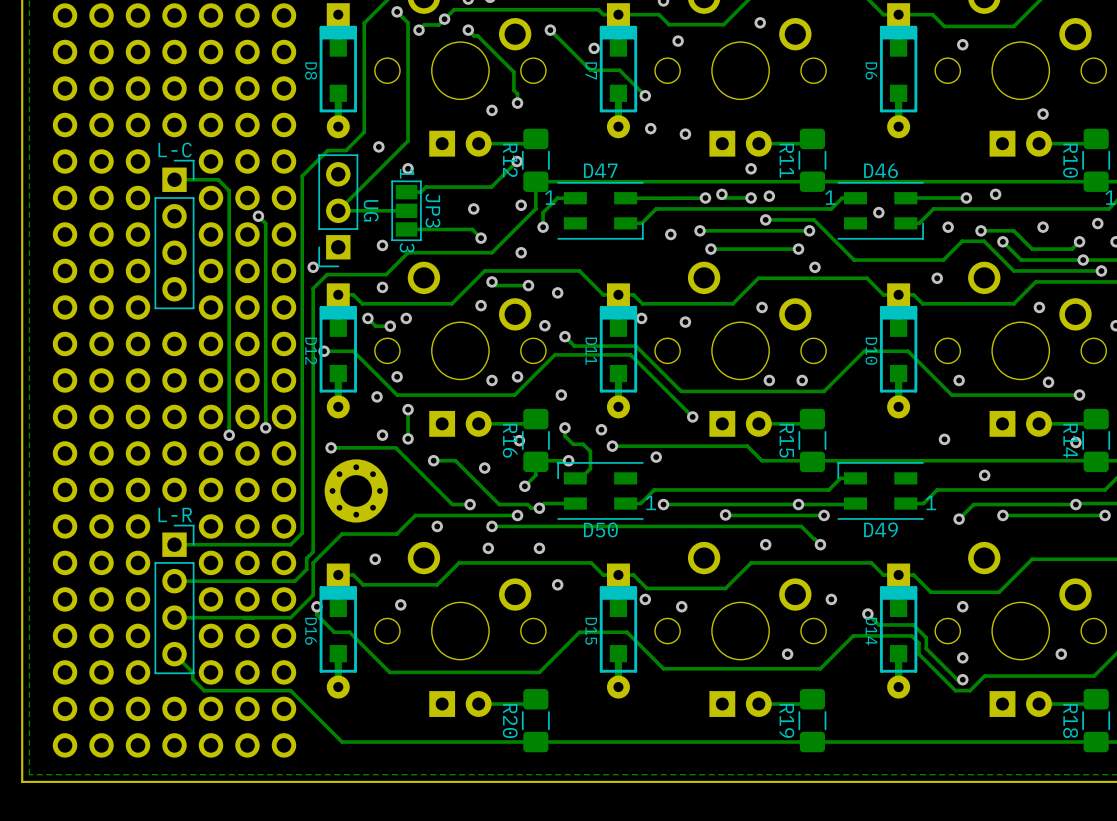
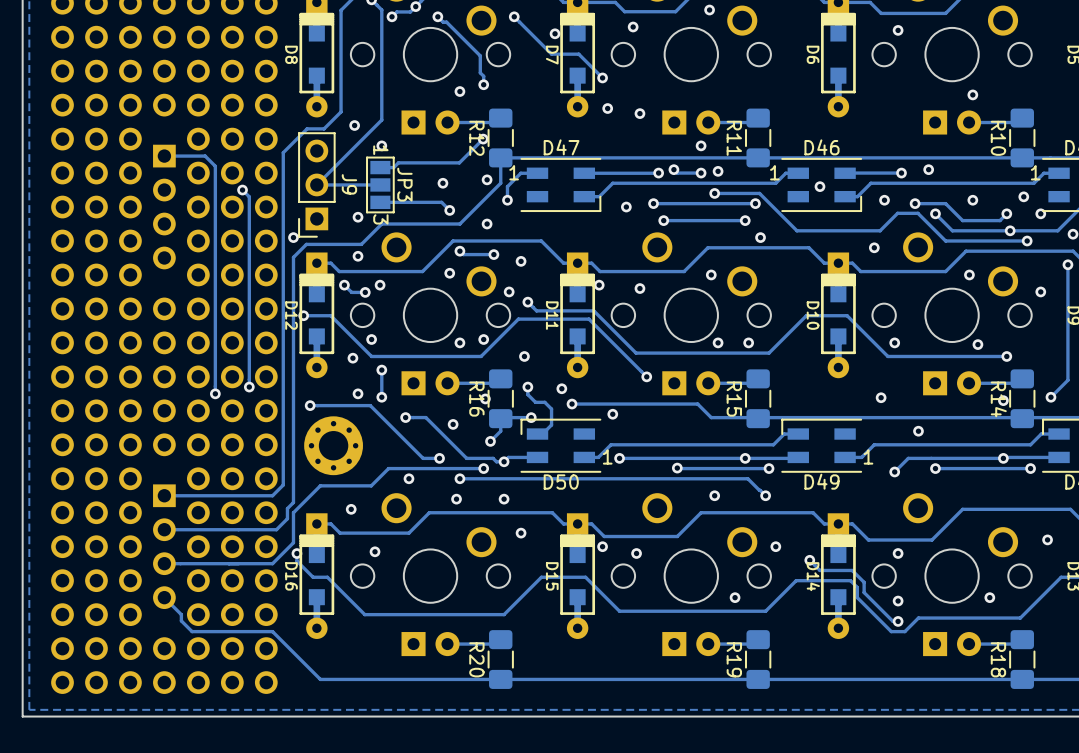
UG name: UG (371, 210) -> J9 (349, 184)
L-C side: bottom (174, 234) -> top (164, 207)
L-R side: bottom (174, 599) -> top (164, 546)

